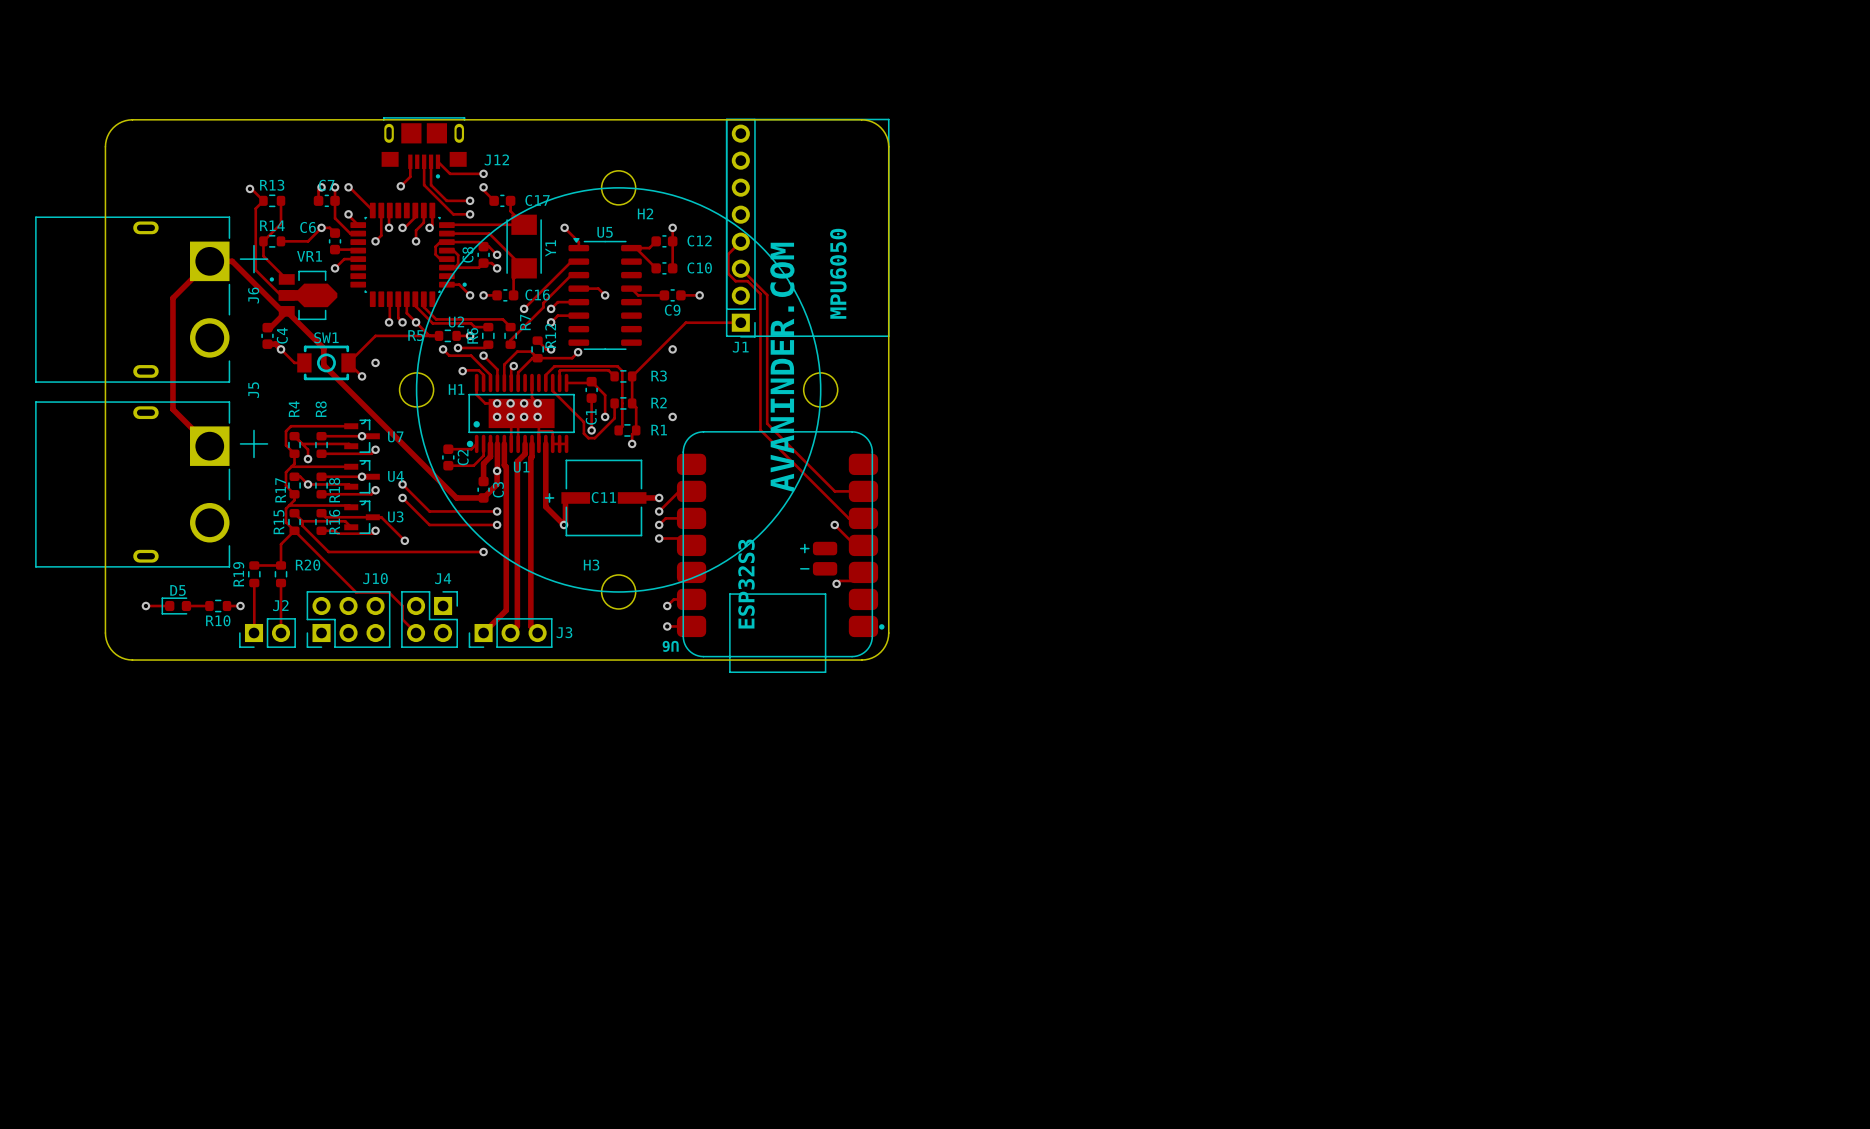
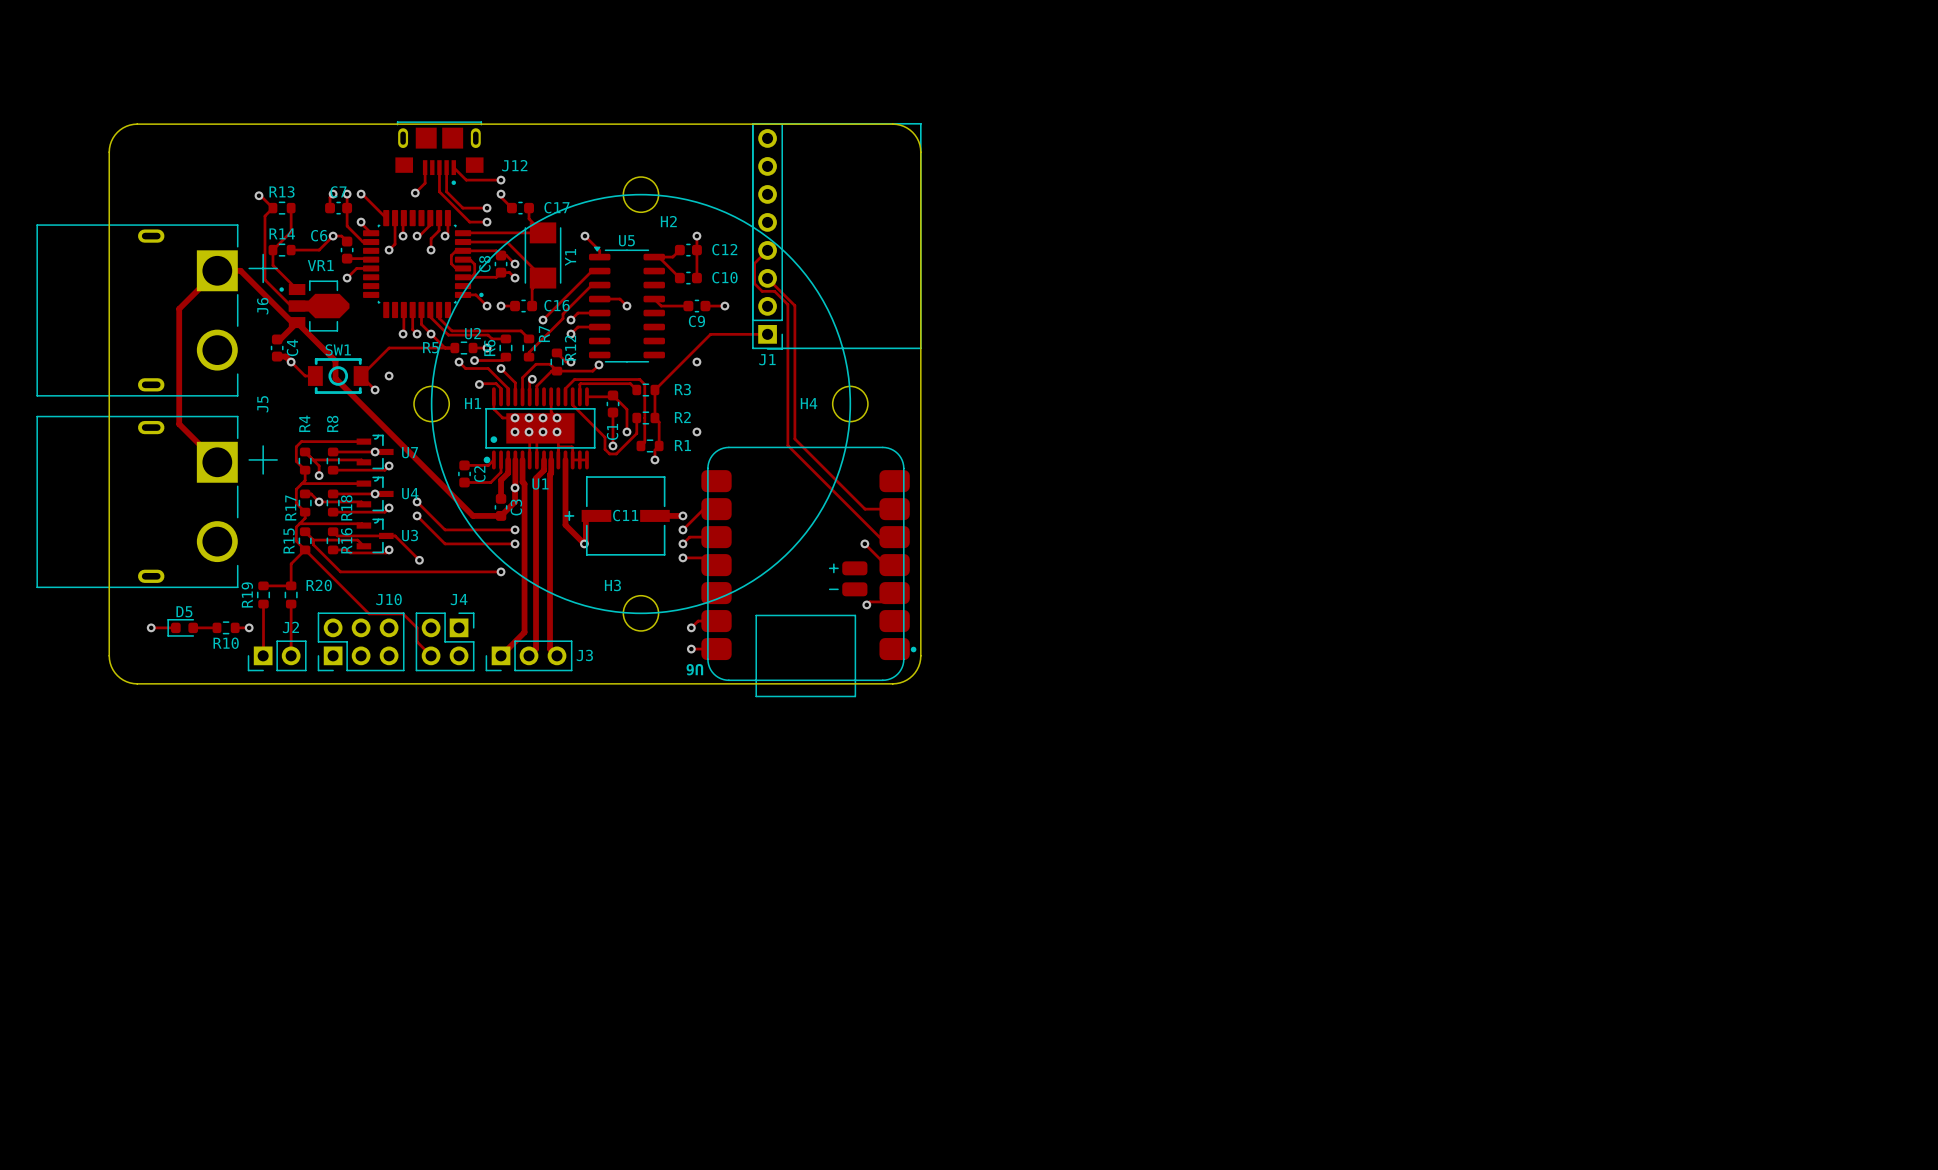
text: MPU6050 (838, 273) -> none
text: AVANINDER.COM (782, 367) -> none
H4 name: none -> H4 (809, 403)
text: ESP32S3 (746, 584) -> none

